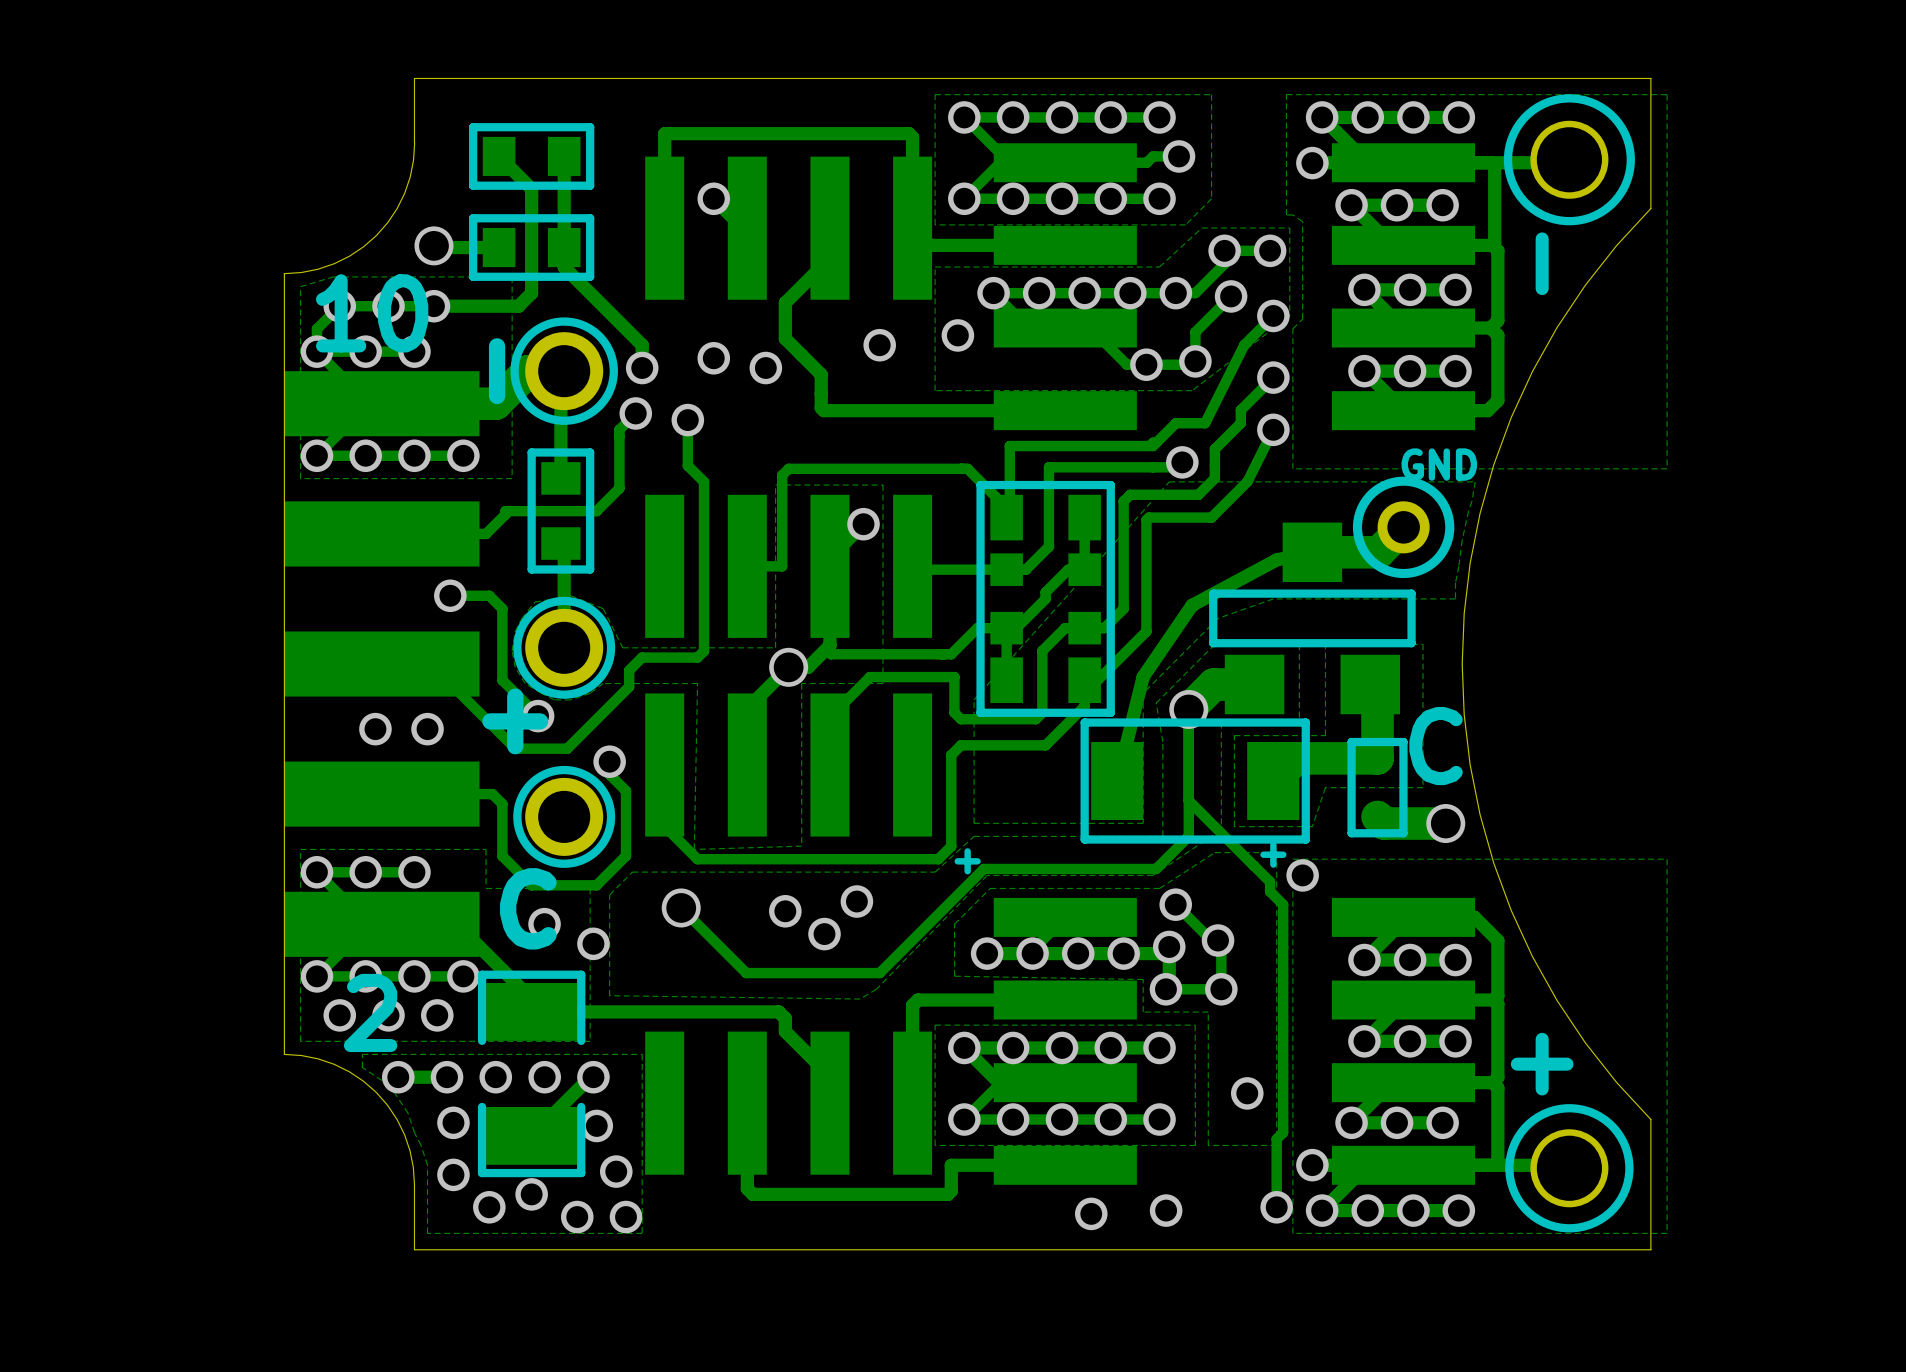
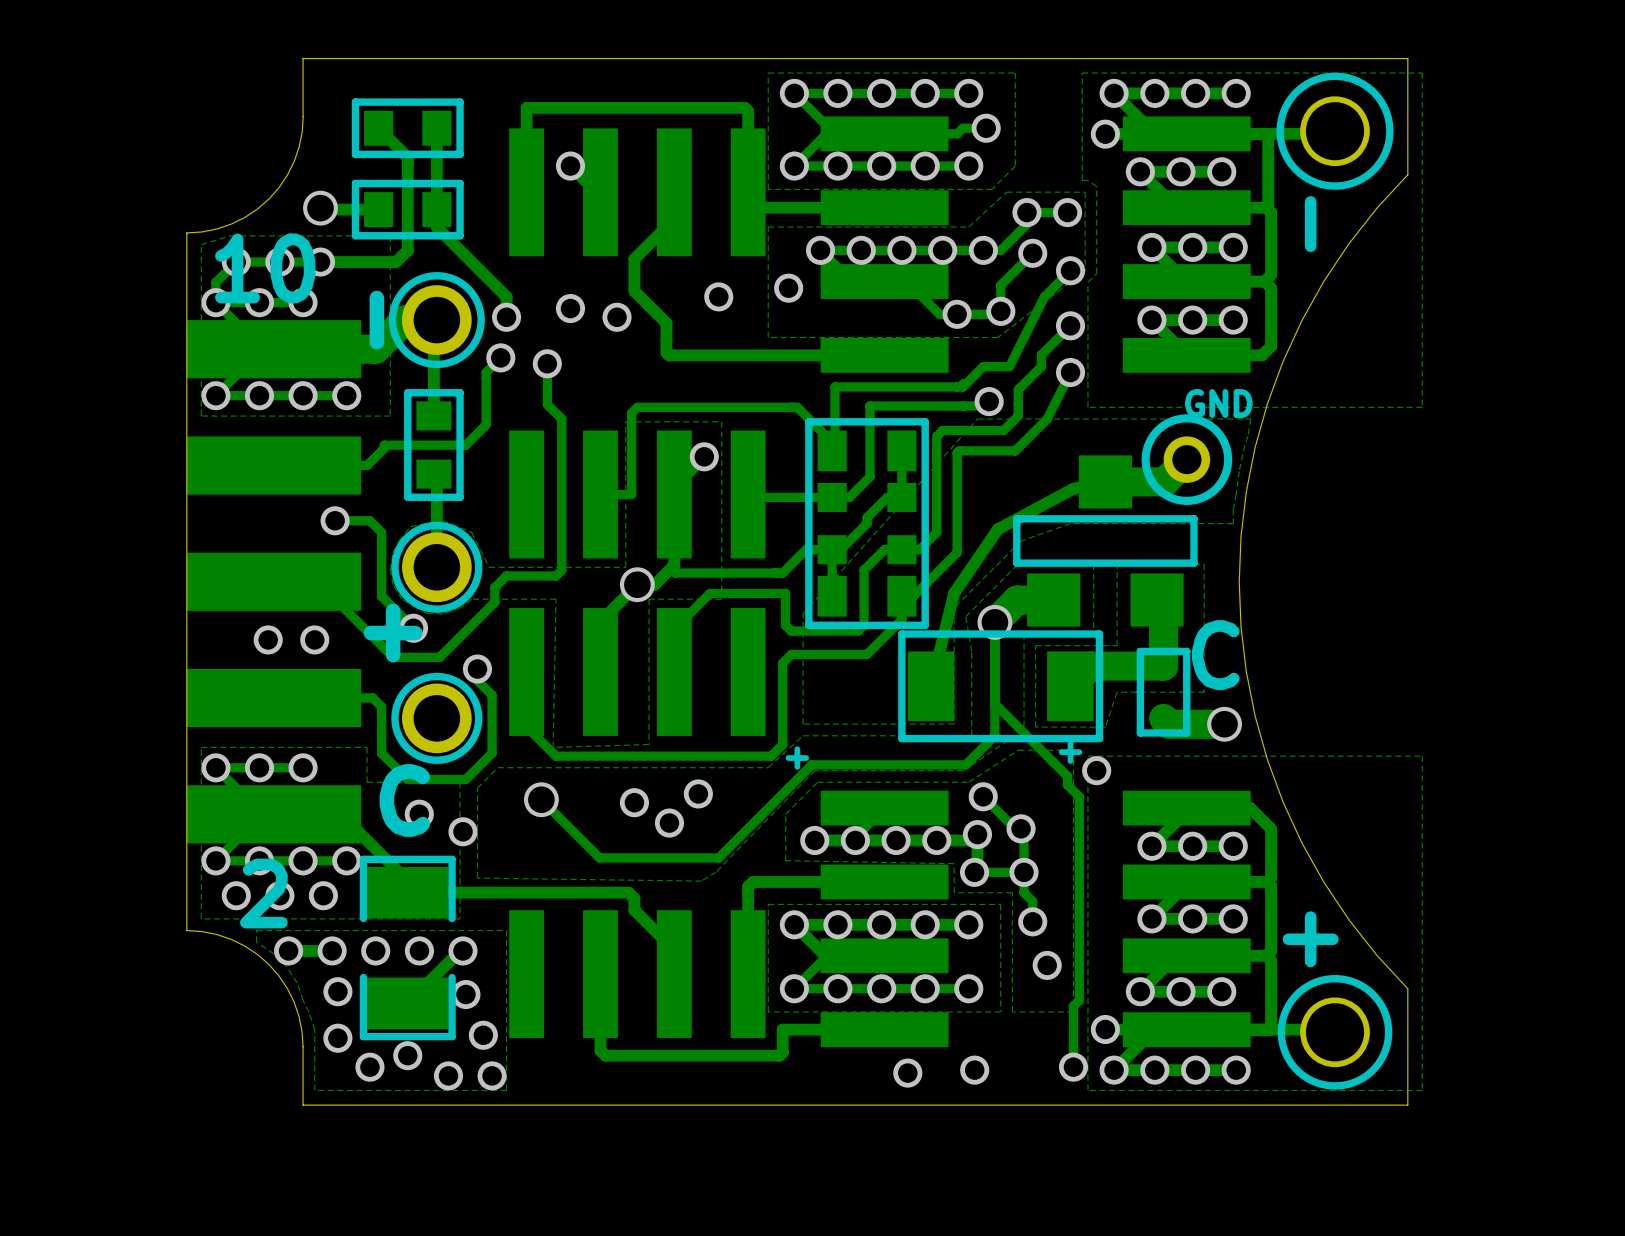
track: none -> (1024, 872) (1024, 892) (1032, 901) (1032, 921)
via: none -> (1032, 921)

